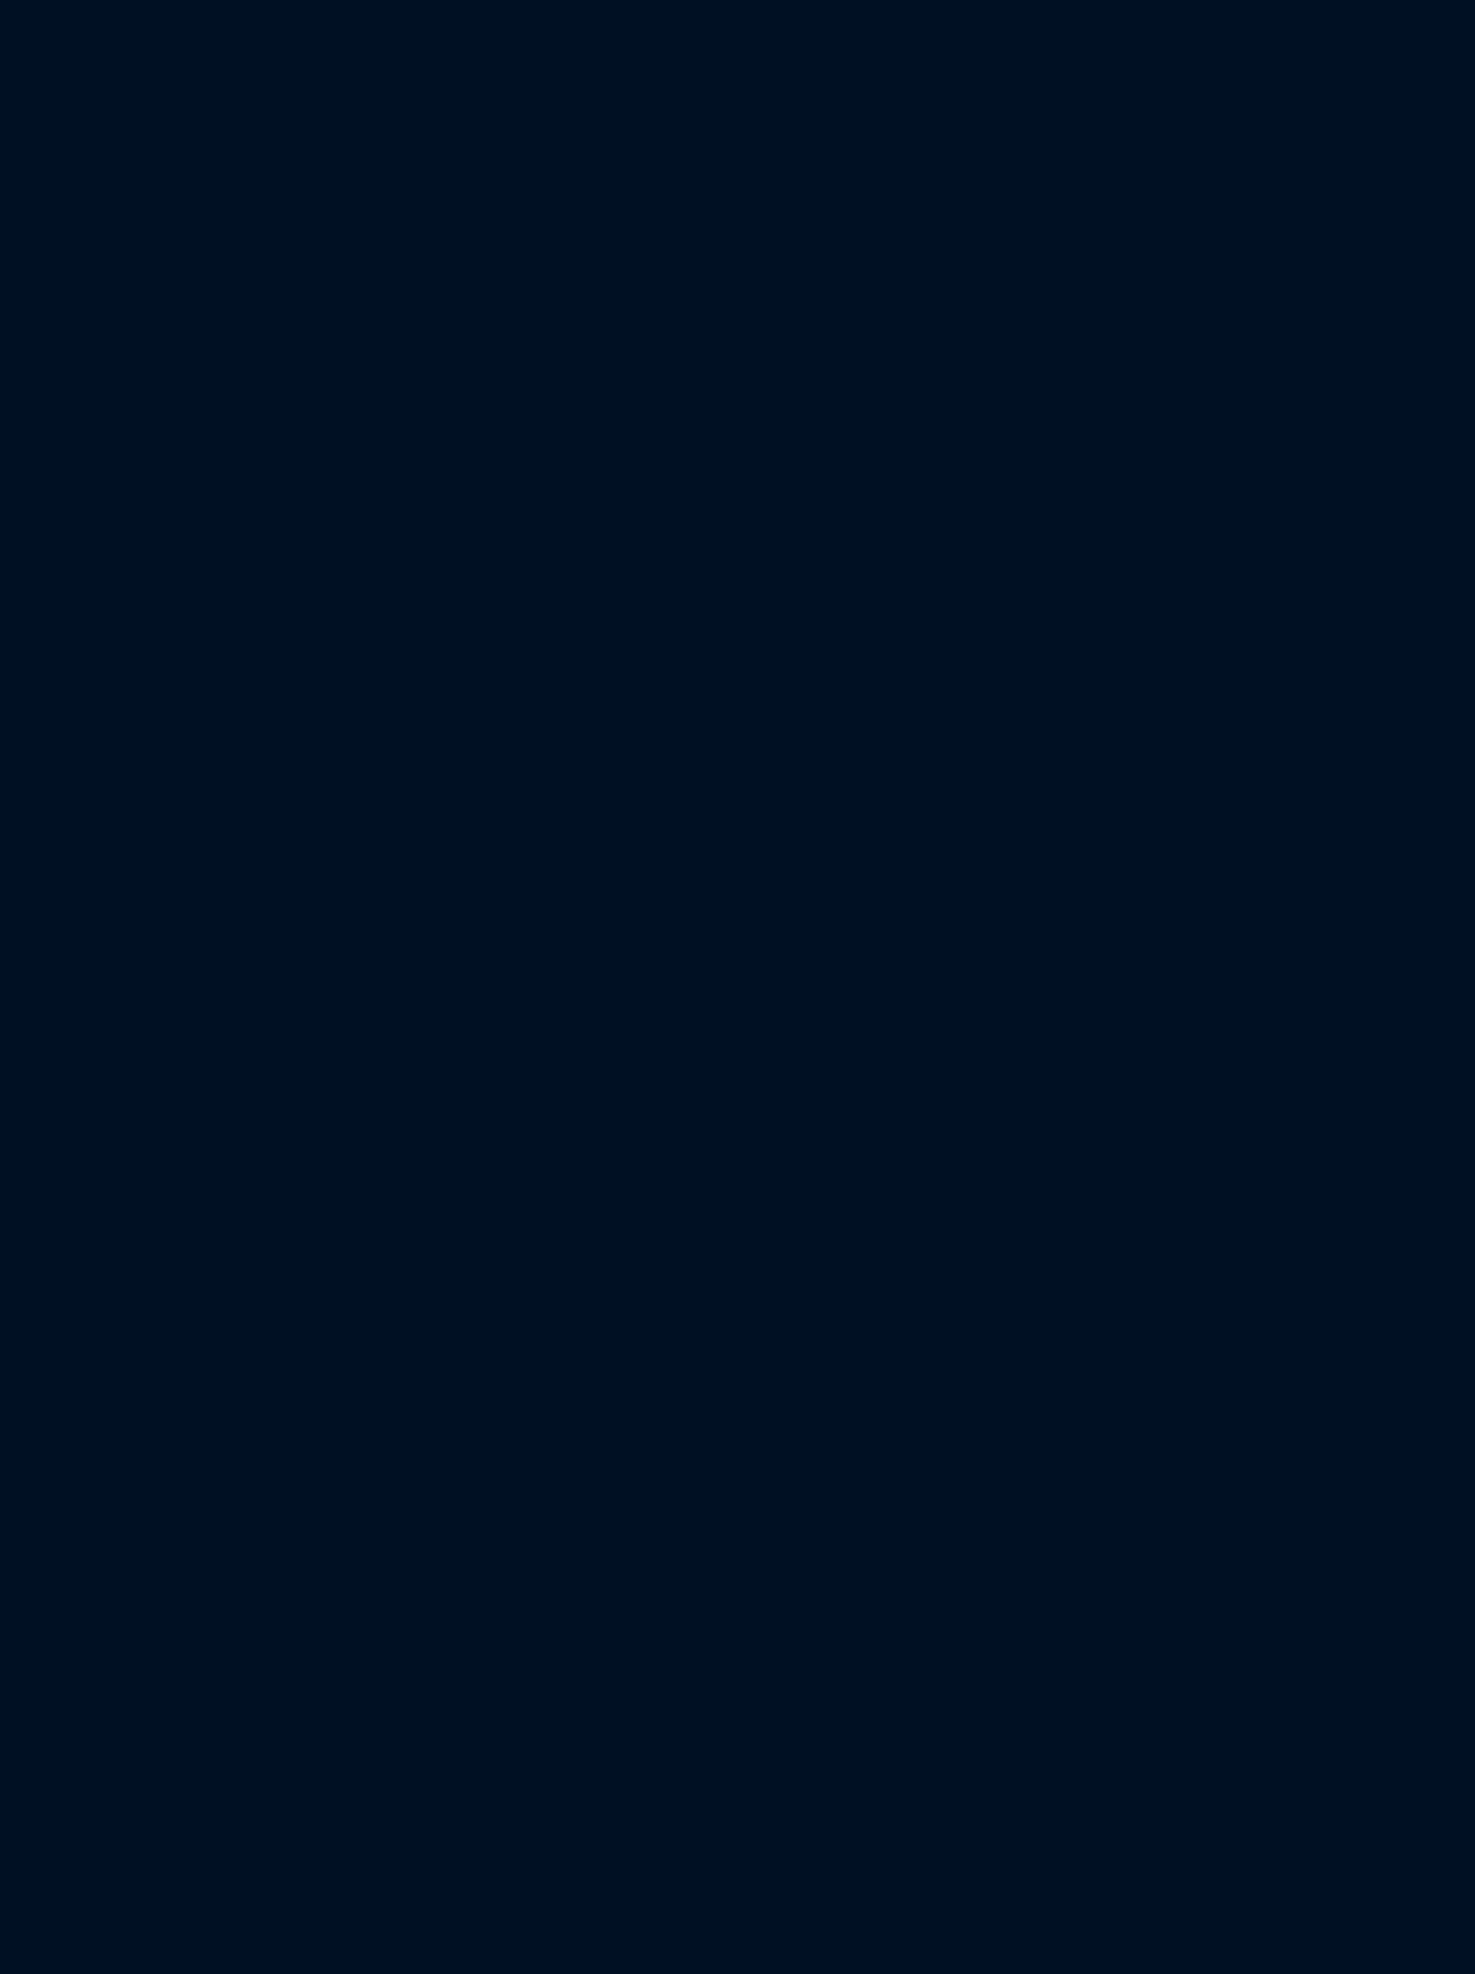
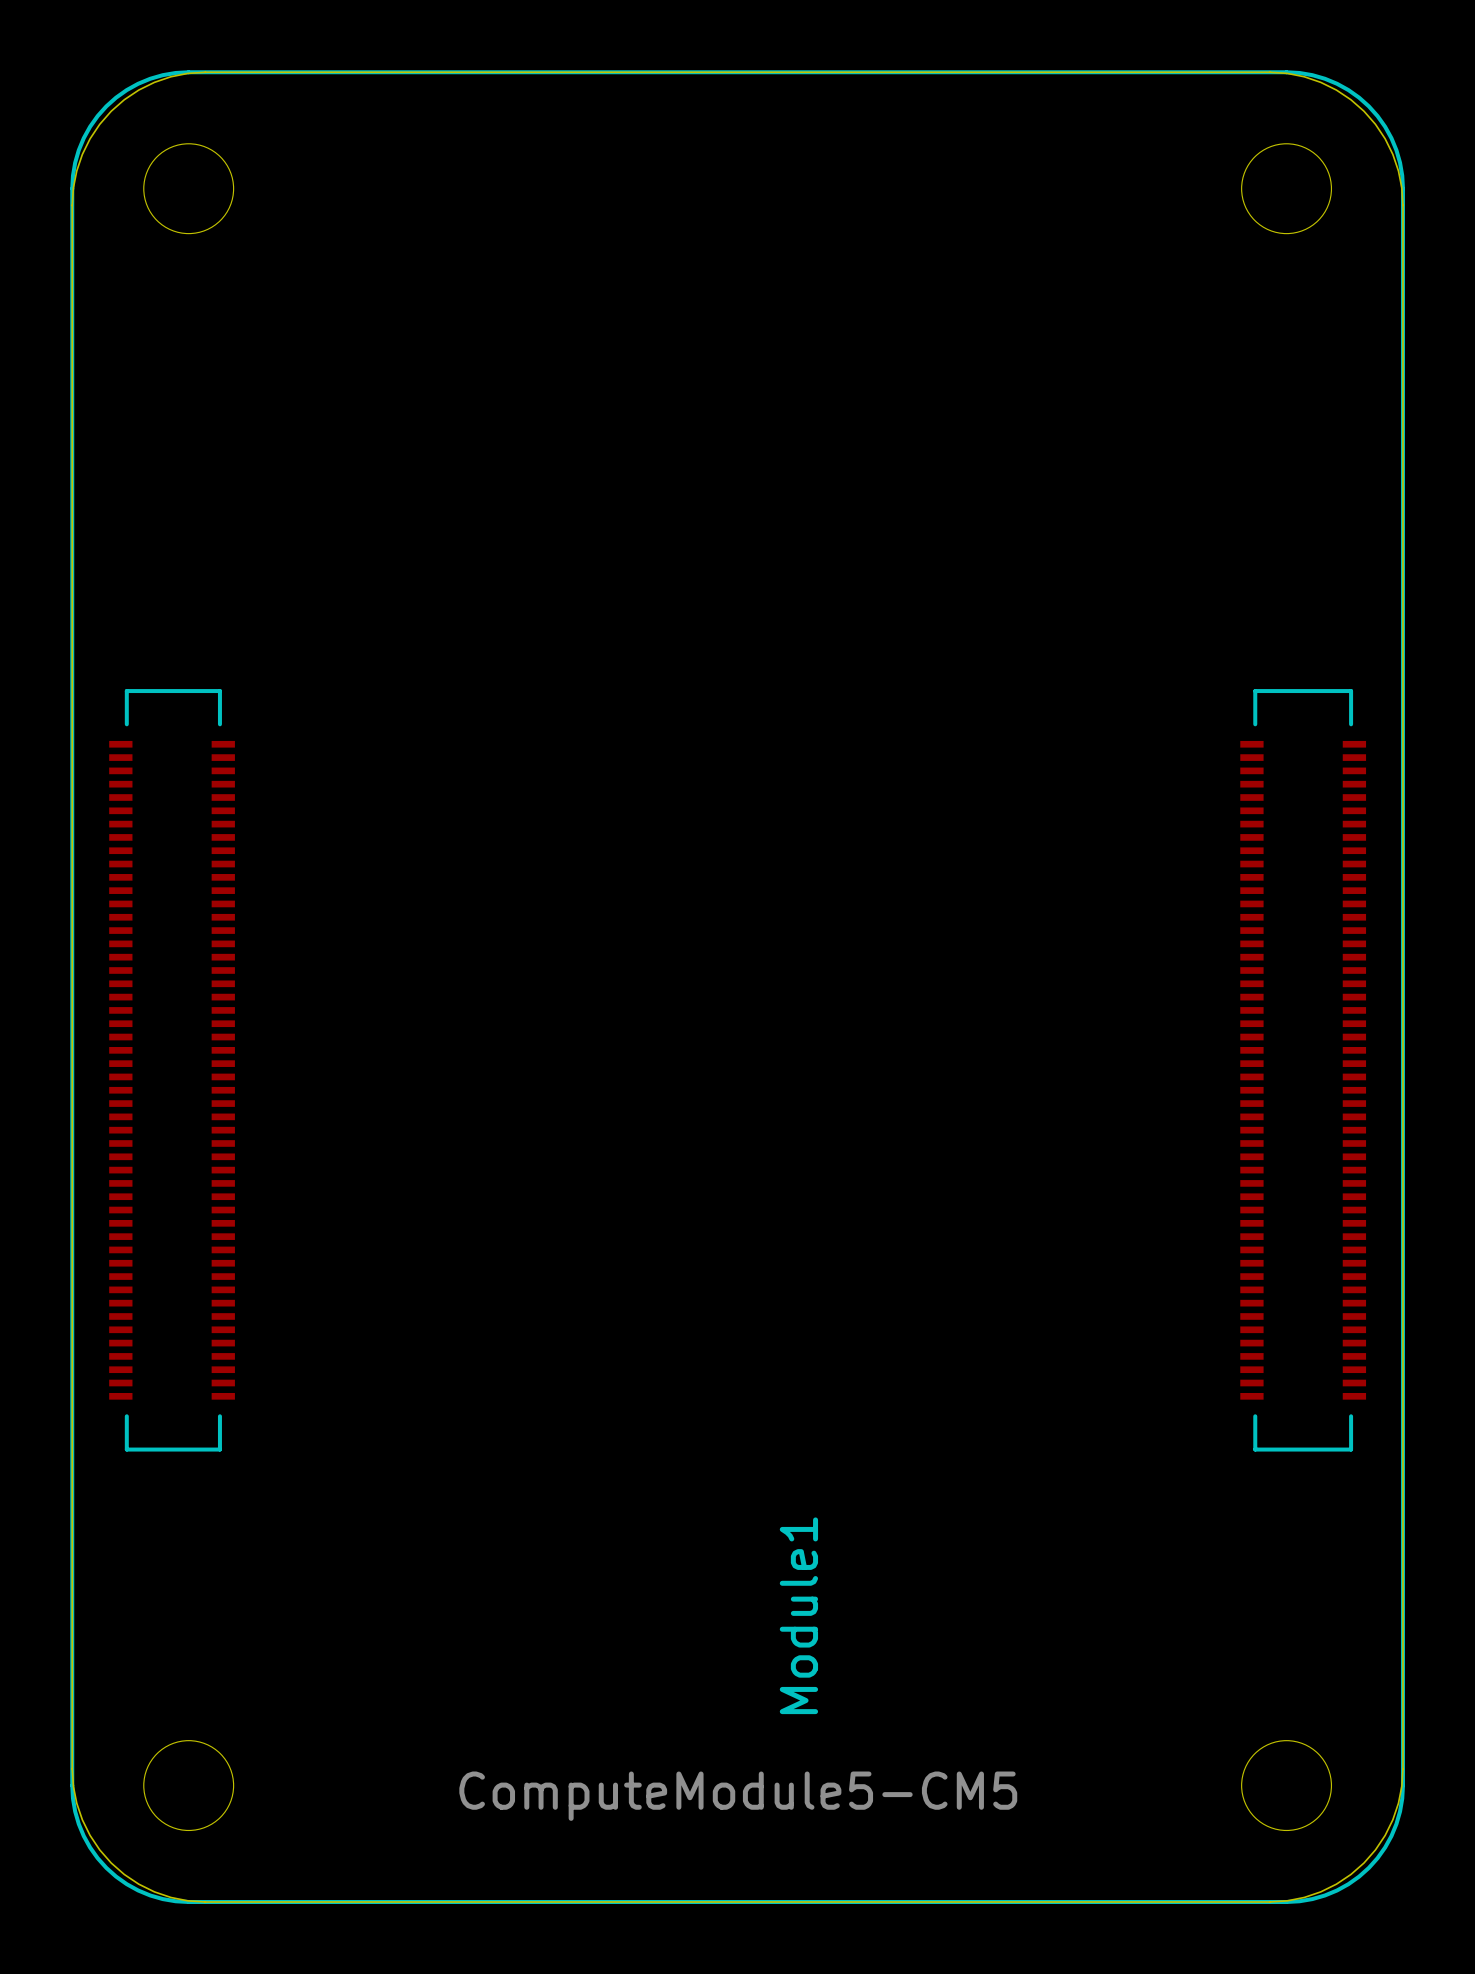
board edge: none -> (205, 72) (1269, 72) (1304, 76) (1336, 90) (1364, 111) (1385, 138) (1398, 170) (1402, 205) (1402, 1768) (1398, 1803) (1385, 1835) (1364, 1863) (1336, 1884) (1304, 1897) (1269, 1902) (205, 1902) (170, 1897) (138, 1884) (111, 1863) (90, 1835) (76, 1803) (72, 1768) (72, 205) (73, 187) (82, 154) (90, 138) (111, 111) (138, 90) (154, 82) (170, 76) (205, 72)
Module1: none -> ComputeModule5-CM5 (737, 987)

